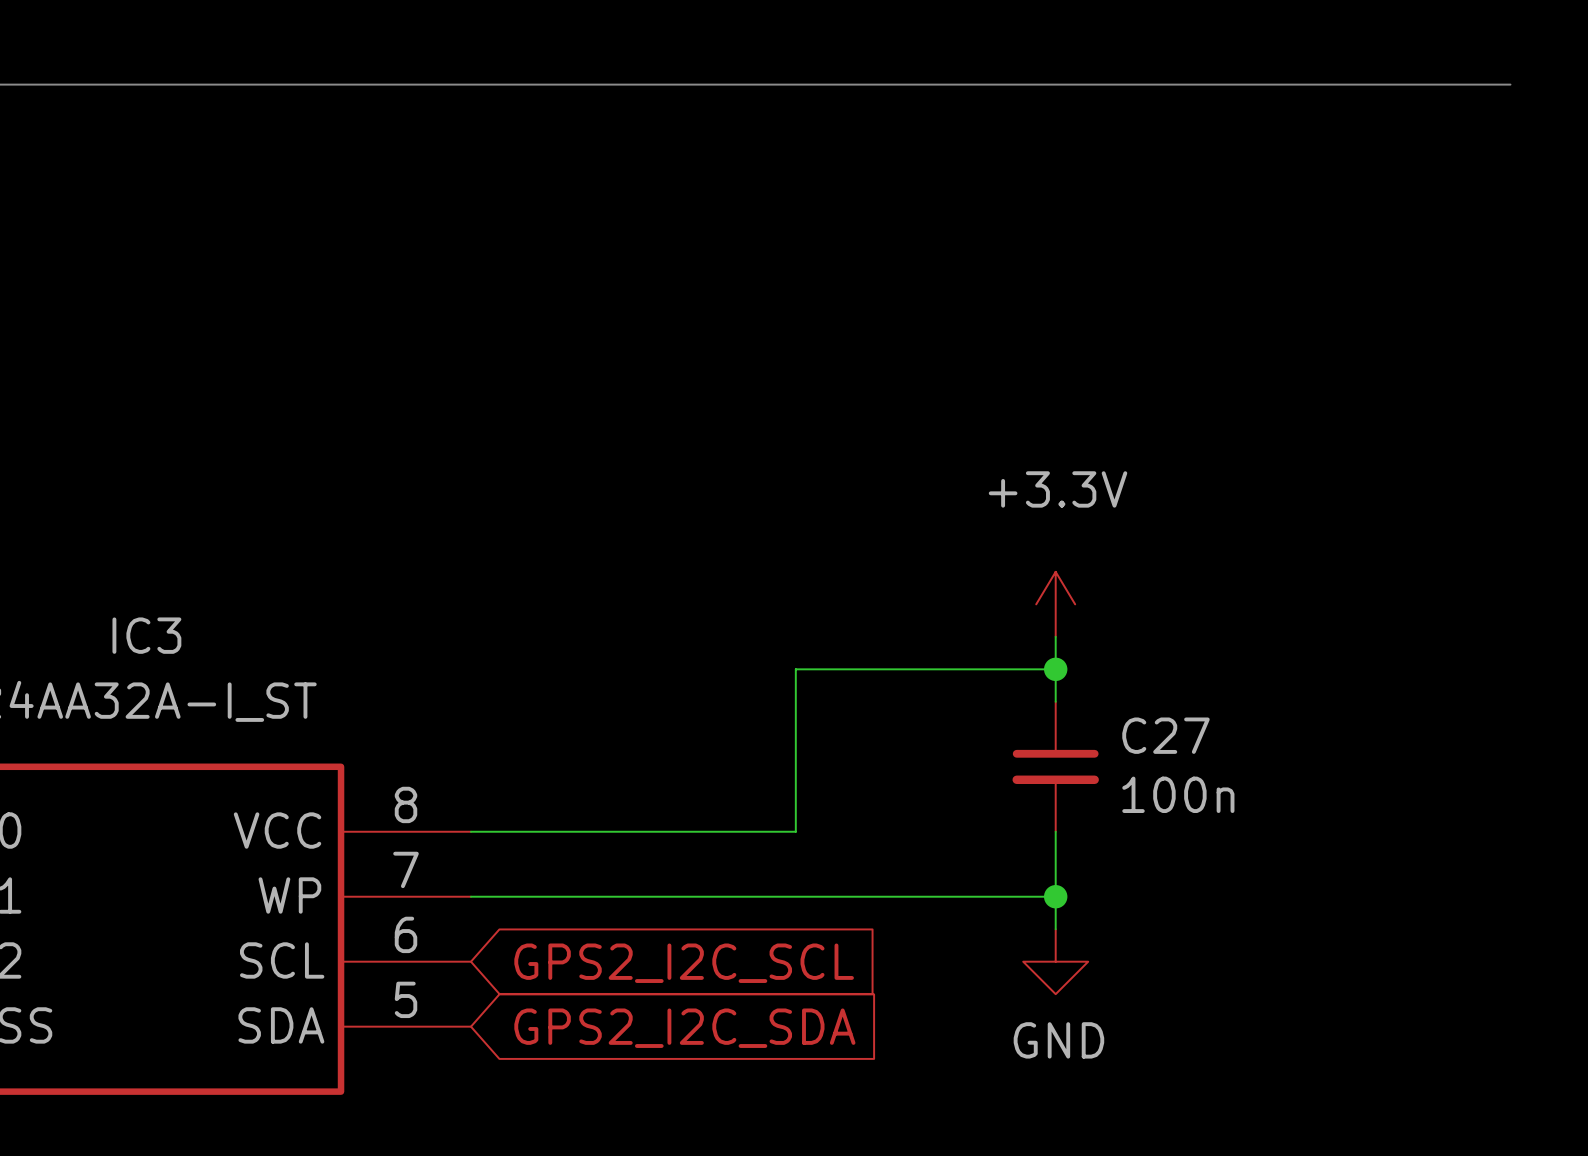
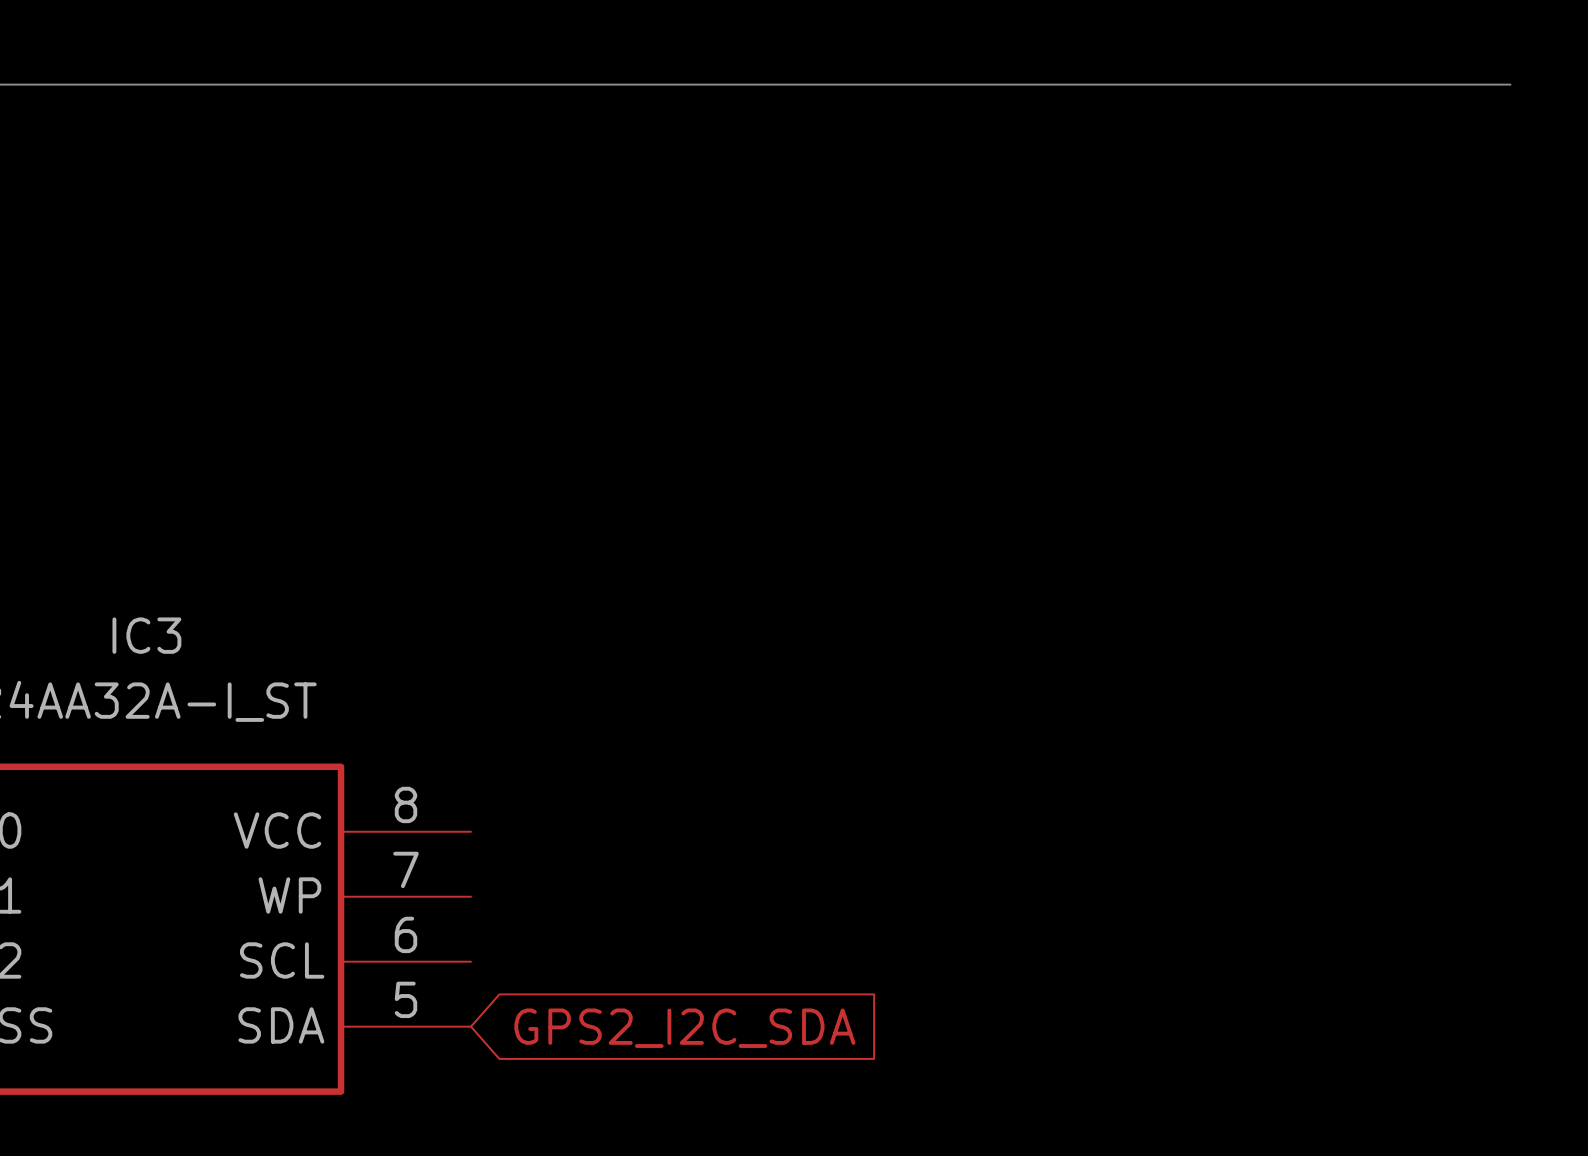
power symbol: +3.3V (1055, 604) -> none
wire: (1055, 636) (1055, 701) -> none
wire: (1055, 669) (795, 669) (795, 831) (470, 831) -> none
junction: (1055, 669) -> none
C27: 100n (1055, 766) -> none
wire: (1055, 831) (1055, 929) -> none
wire: (470, 896) (1055, 896) -> none
junction: (1055, 896) -> none
power symbol: GND (1055, 961) -> none
global label: GPS2_I2C_SCL (684, 963) -> none

